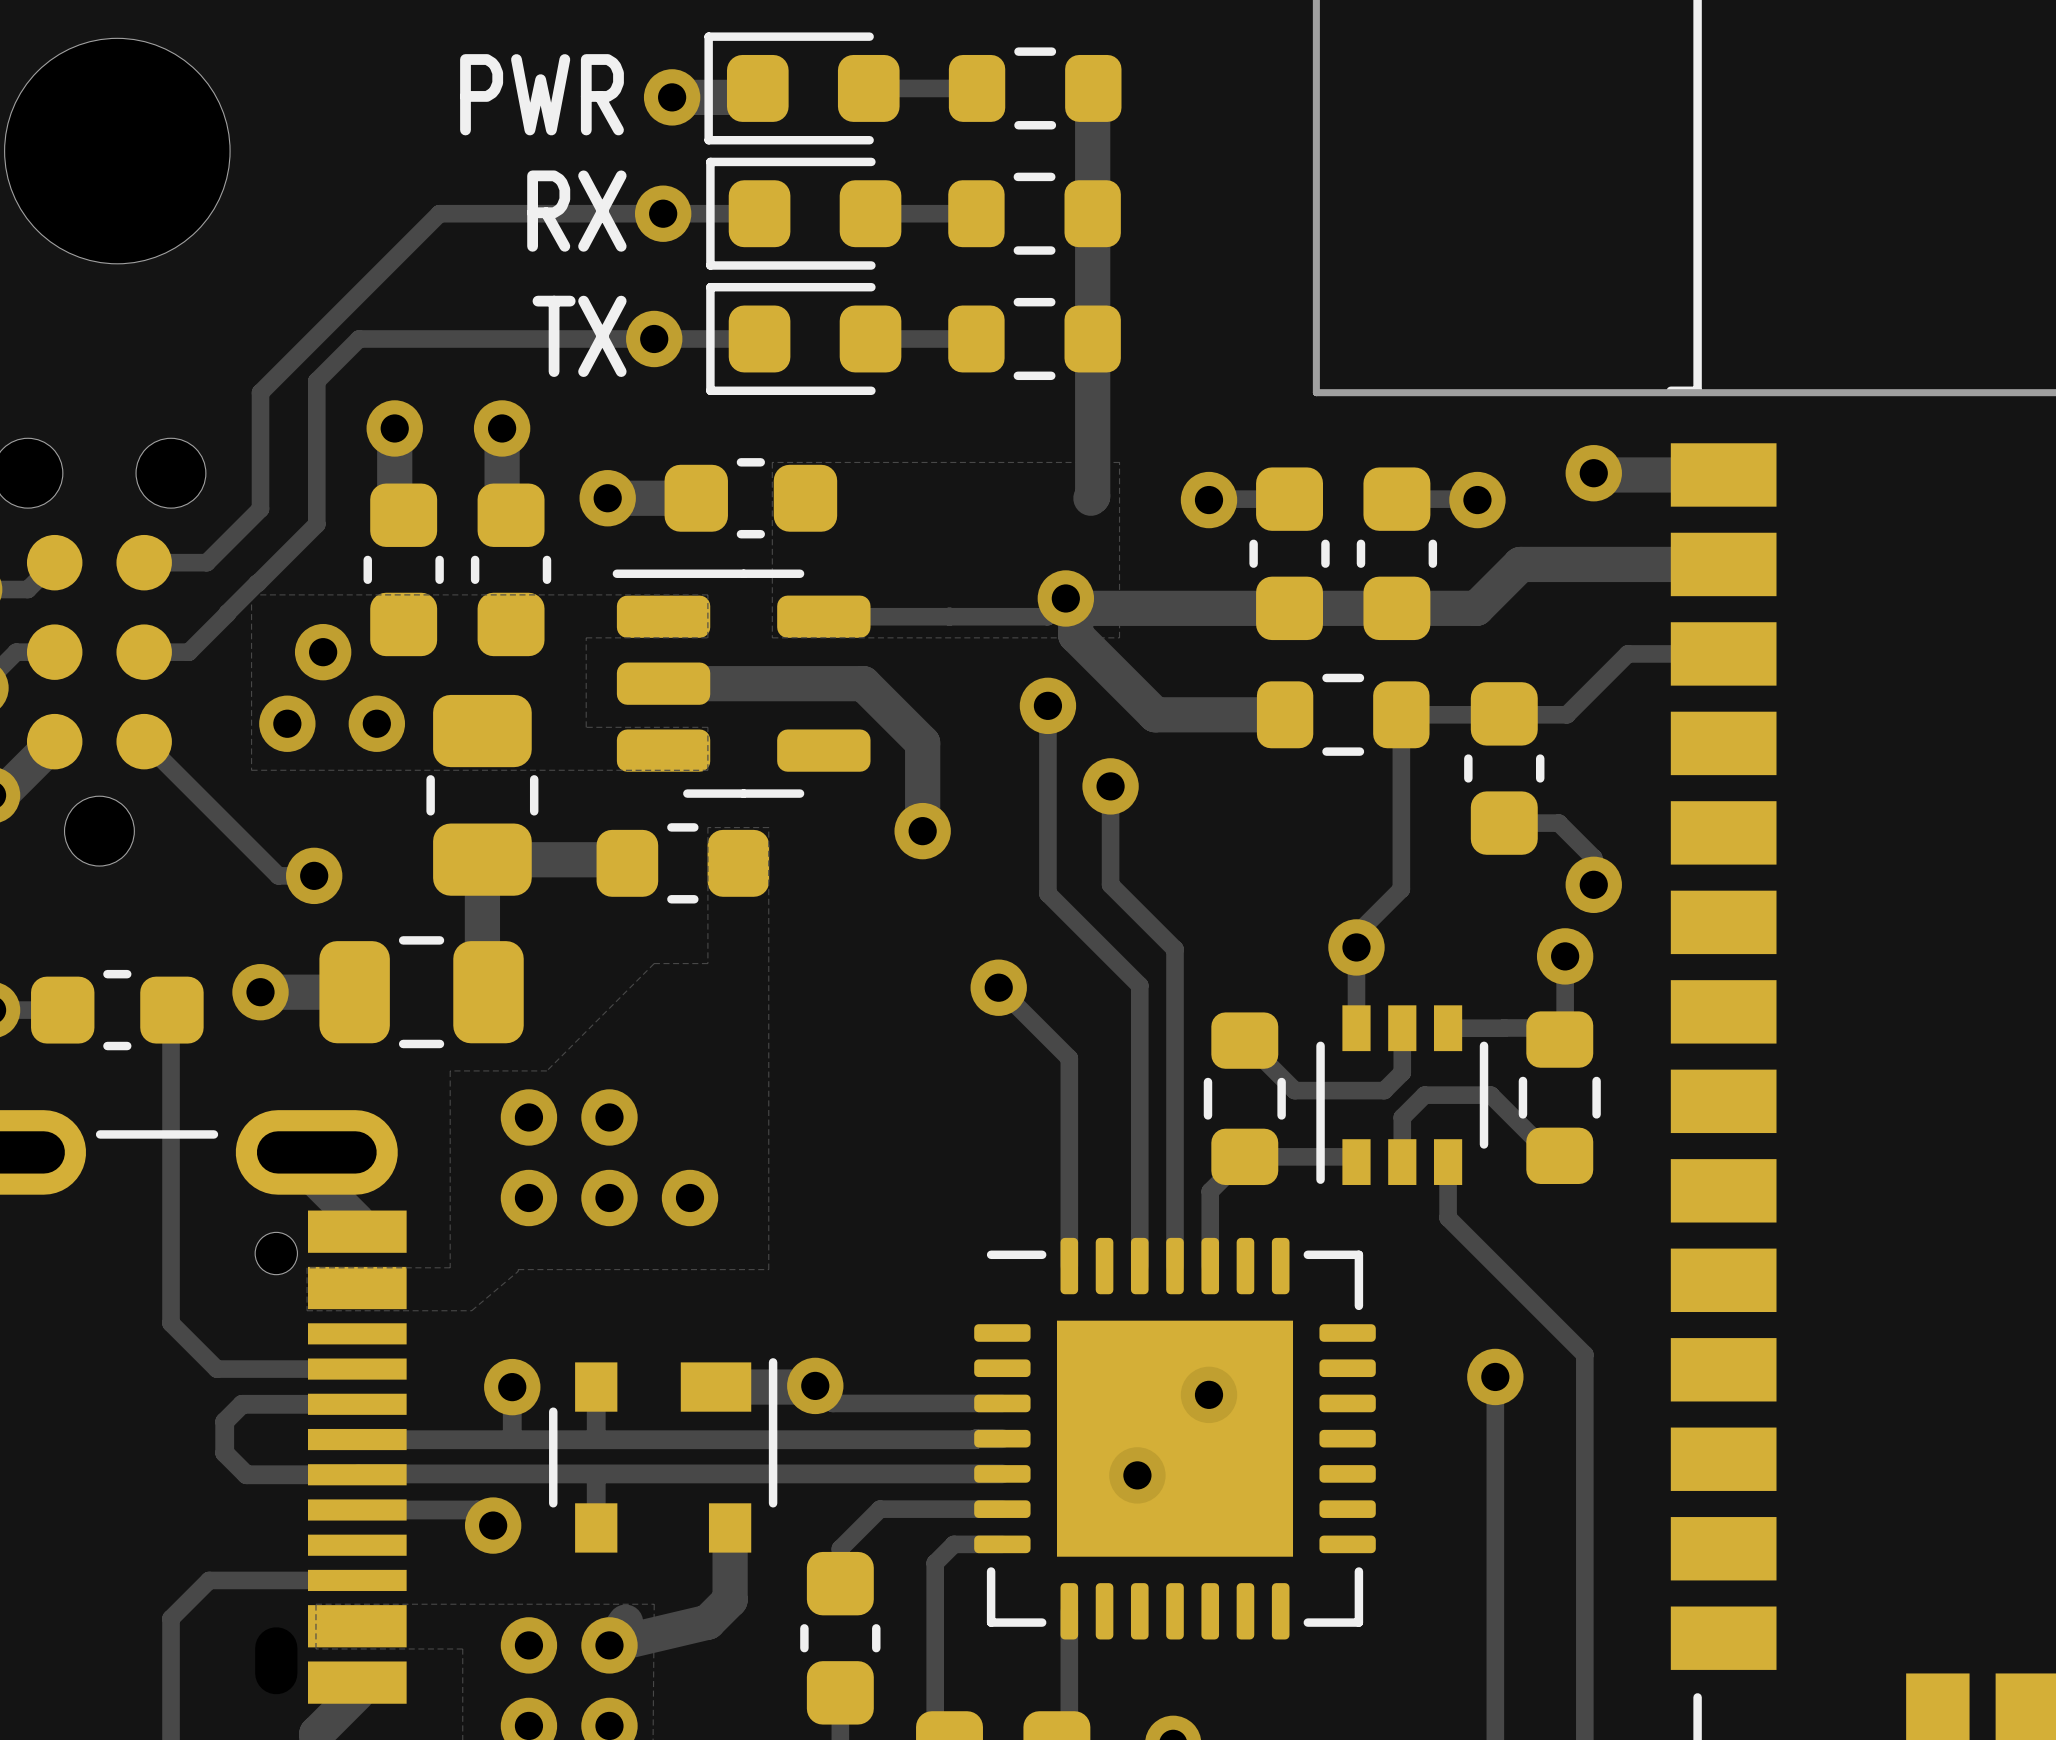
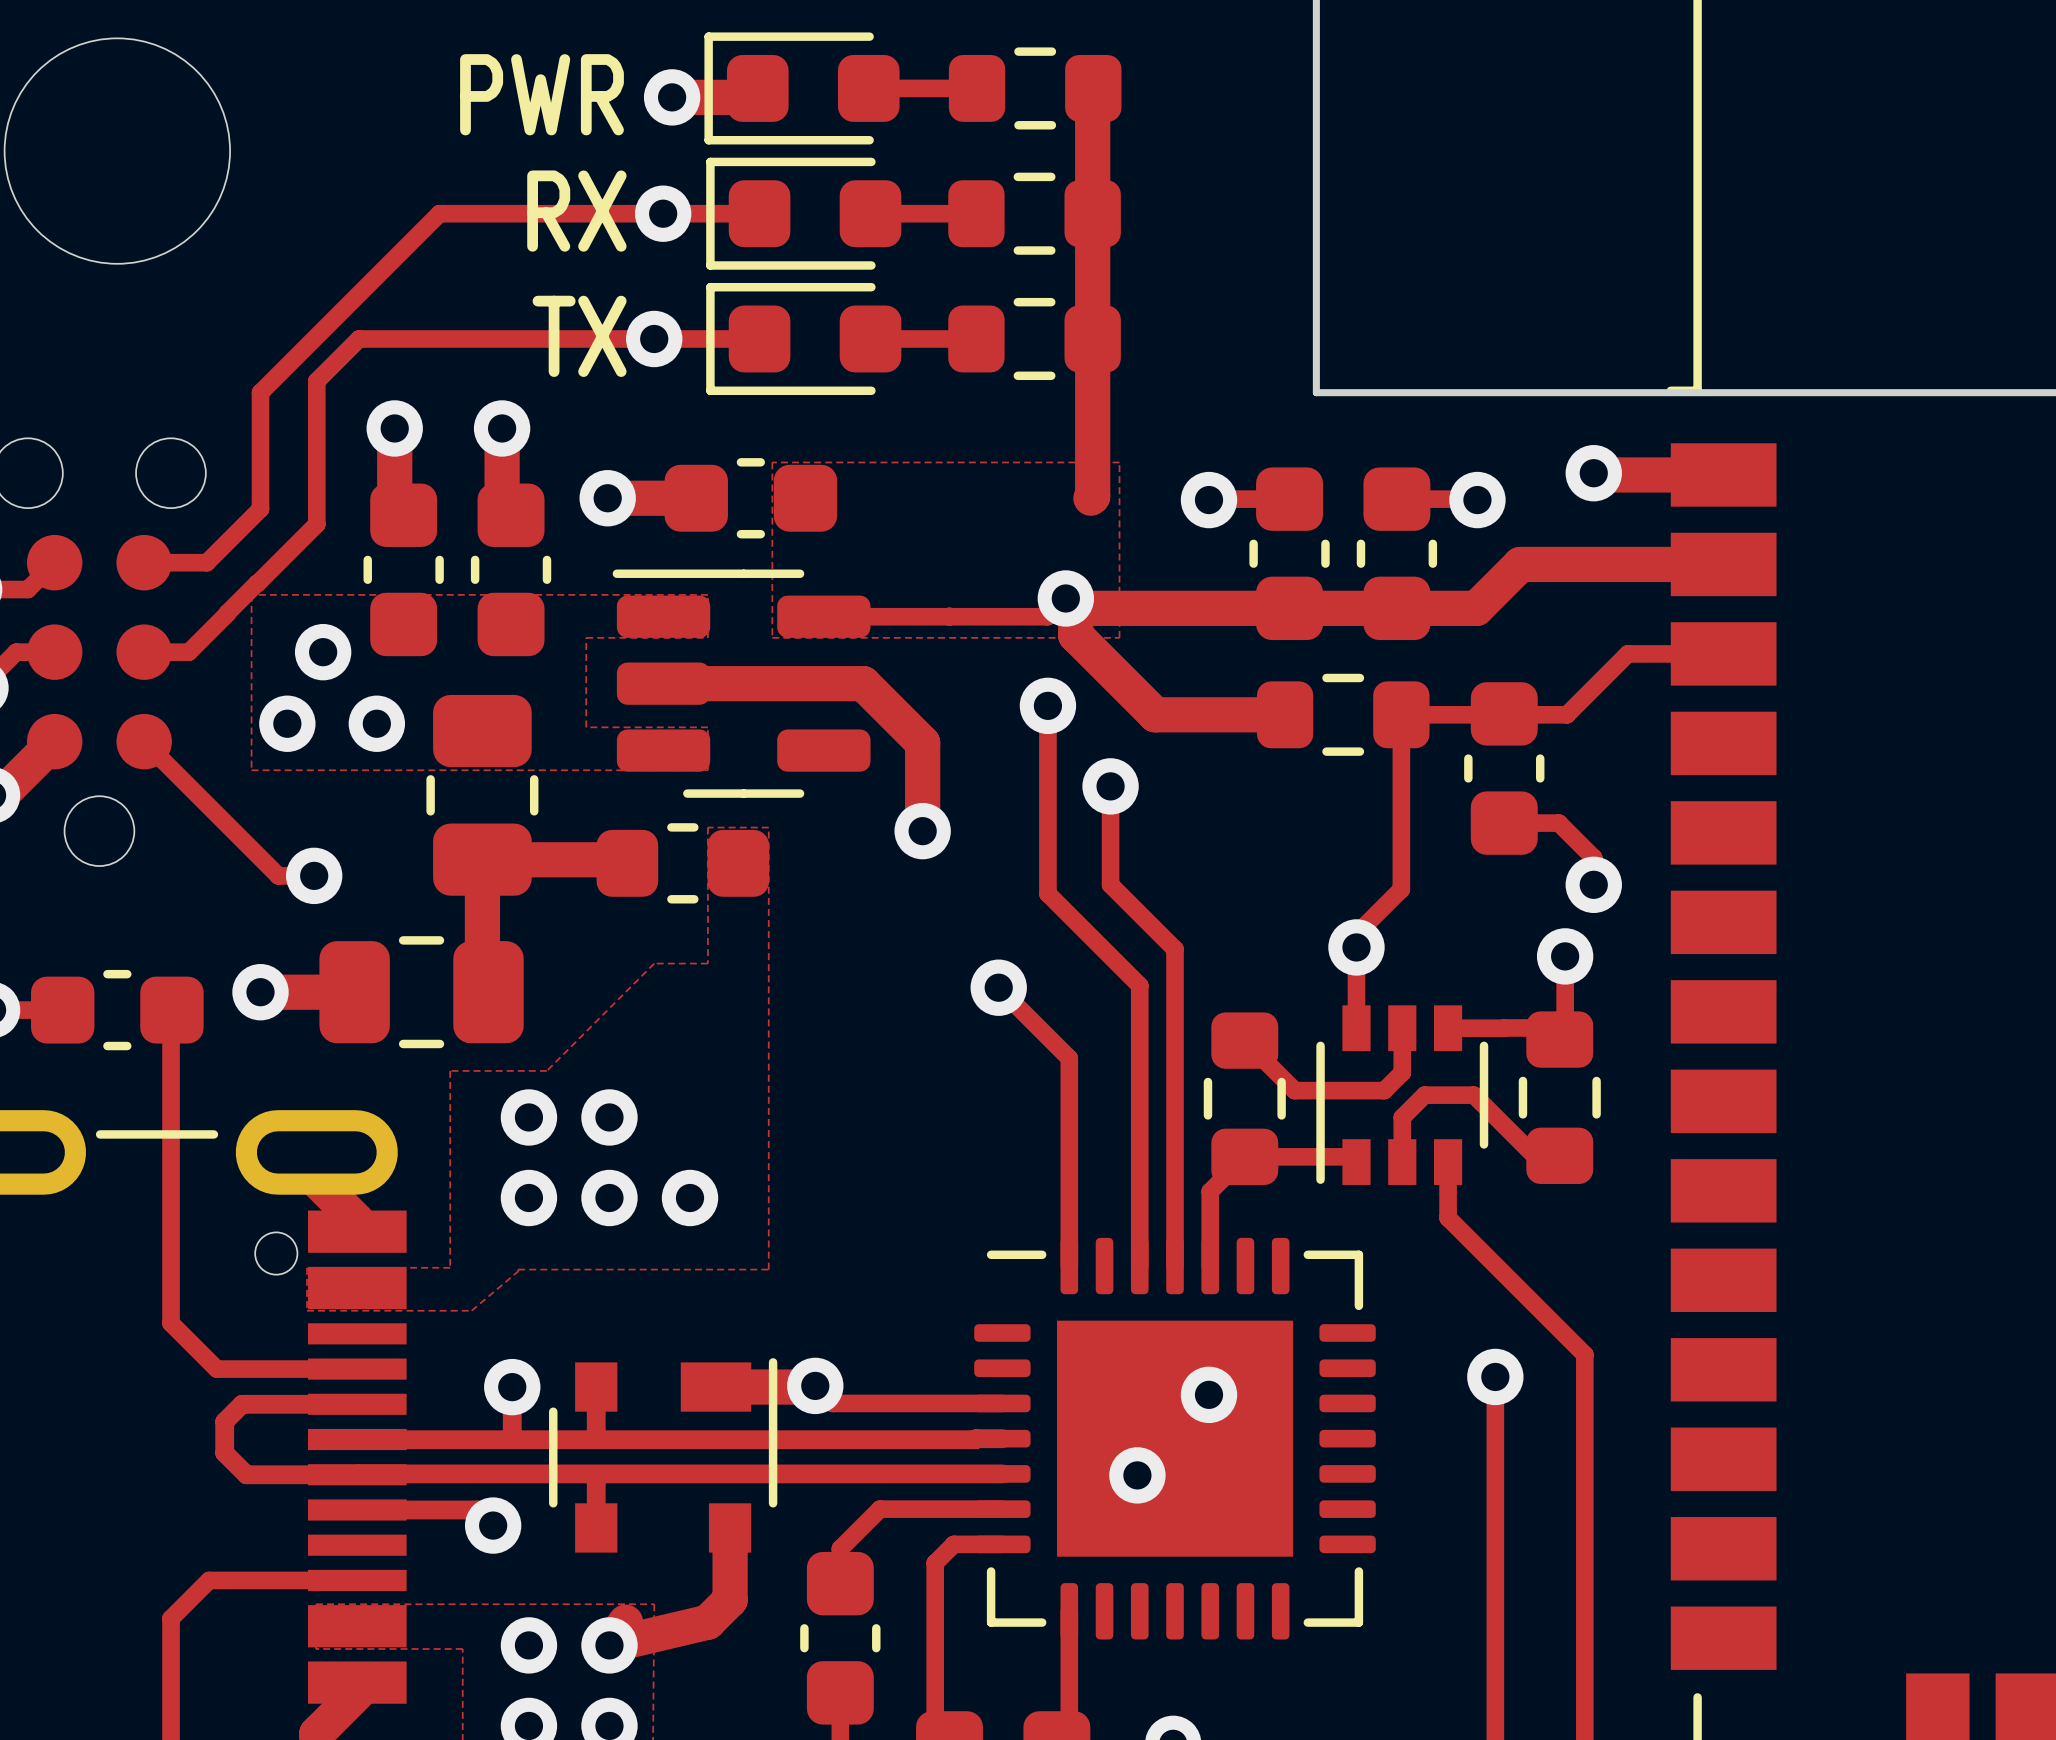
track: (1473, 1095) (1490, 1095) (1551, 1155) -> (1473, 1095) (1534, 1155) (1551, 1155)

